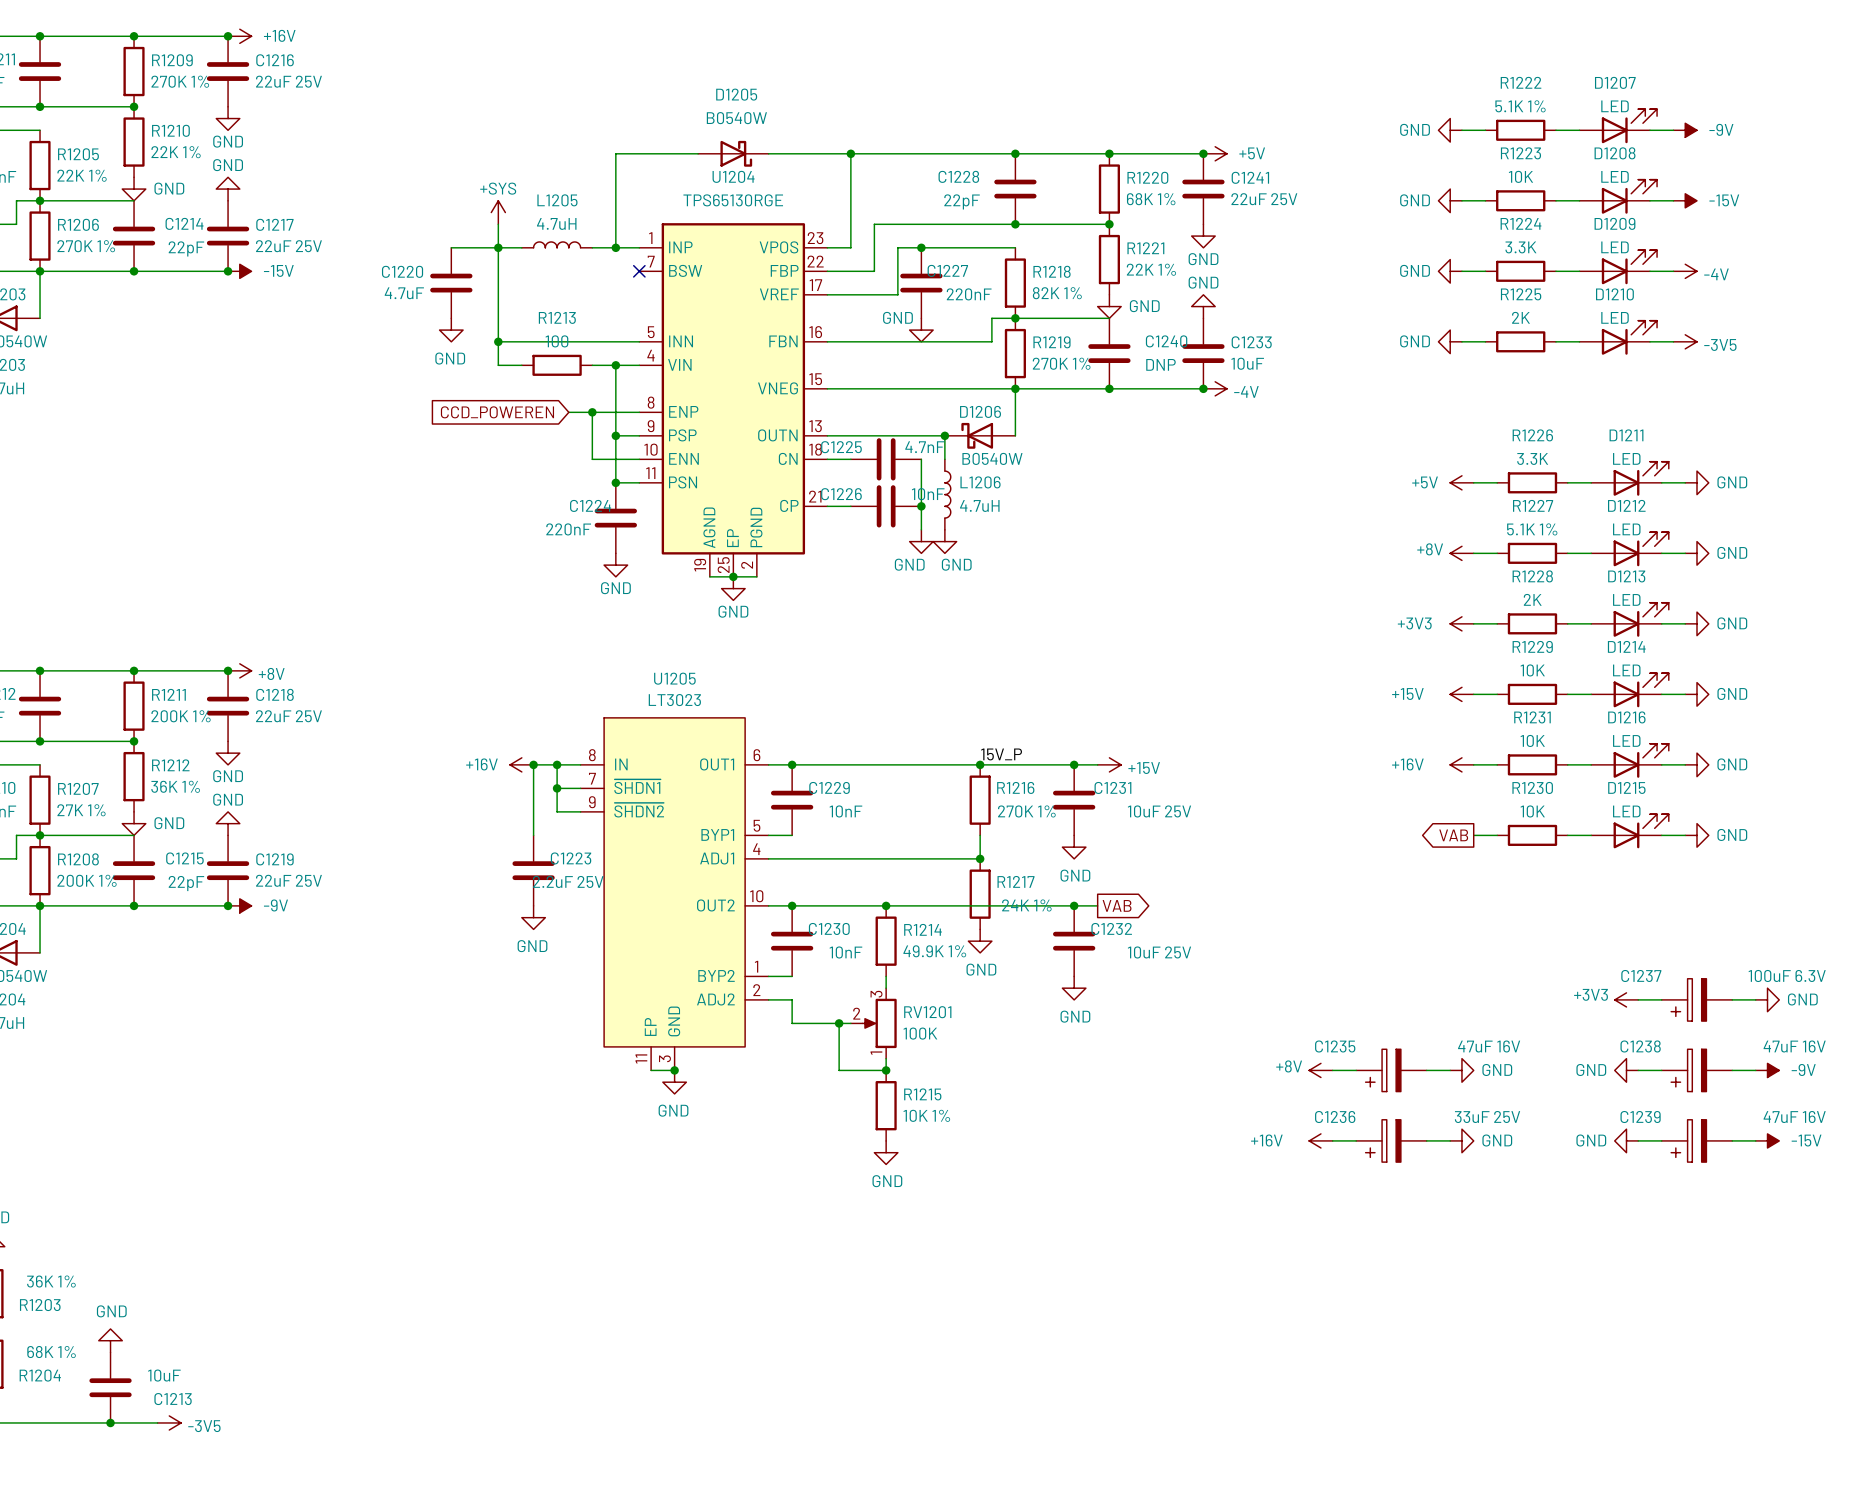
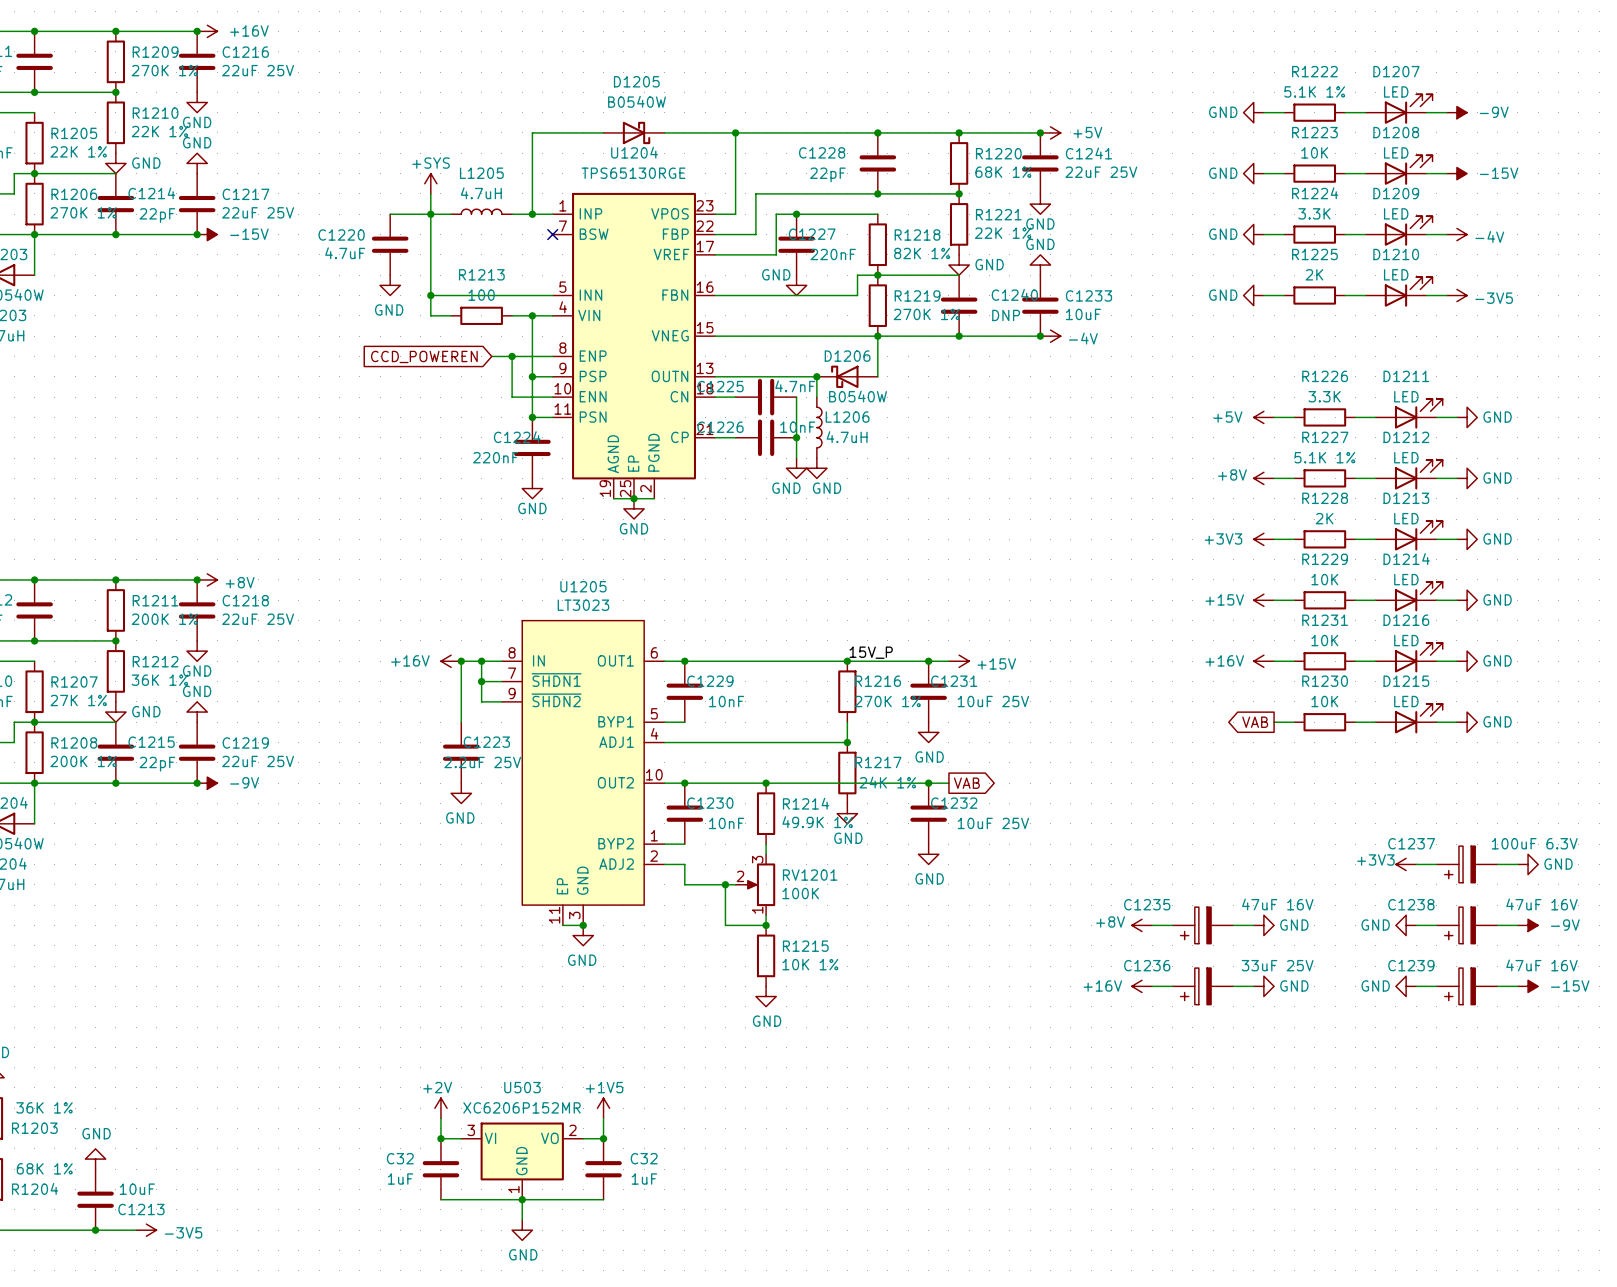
power symbol: none -> +2V (440, 1108)
power symbol: none -> +1V5 (603, 1108)
wire: none -> (440, 1118) (440, 1138) (461, 1138)
wire: none -> (603, 1118) (603, 1138) (583, 1138)
junction: none -> (440, 1138)
junction: none -> (603, 1138)
U503: none -> XC6206P152MR (522, 1161)
C32: none -> 1uF (440, 1169)
C32: none -> 1uF (603, 1169)
wire: none -> (440, 1199) (603, 1199)
wire: none -> (522, 1199) (522, 1220)
junction: none -> (522, 1199)
power symbol: none -> GND (522, 1230)

